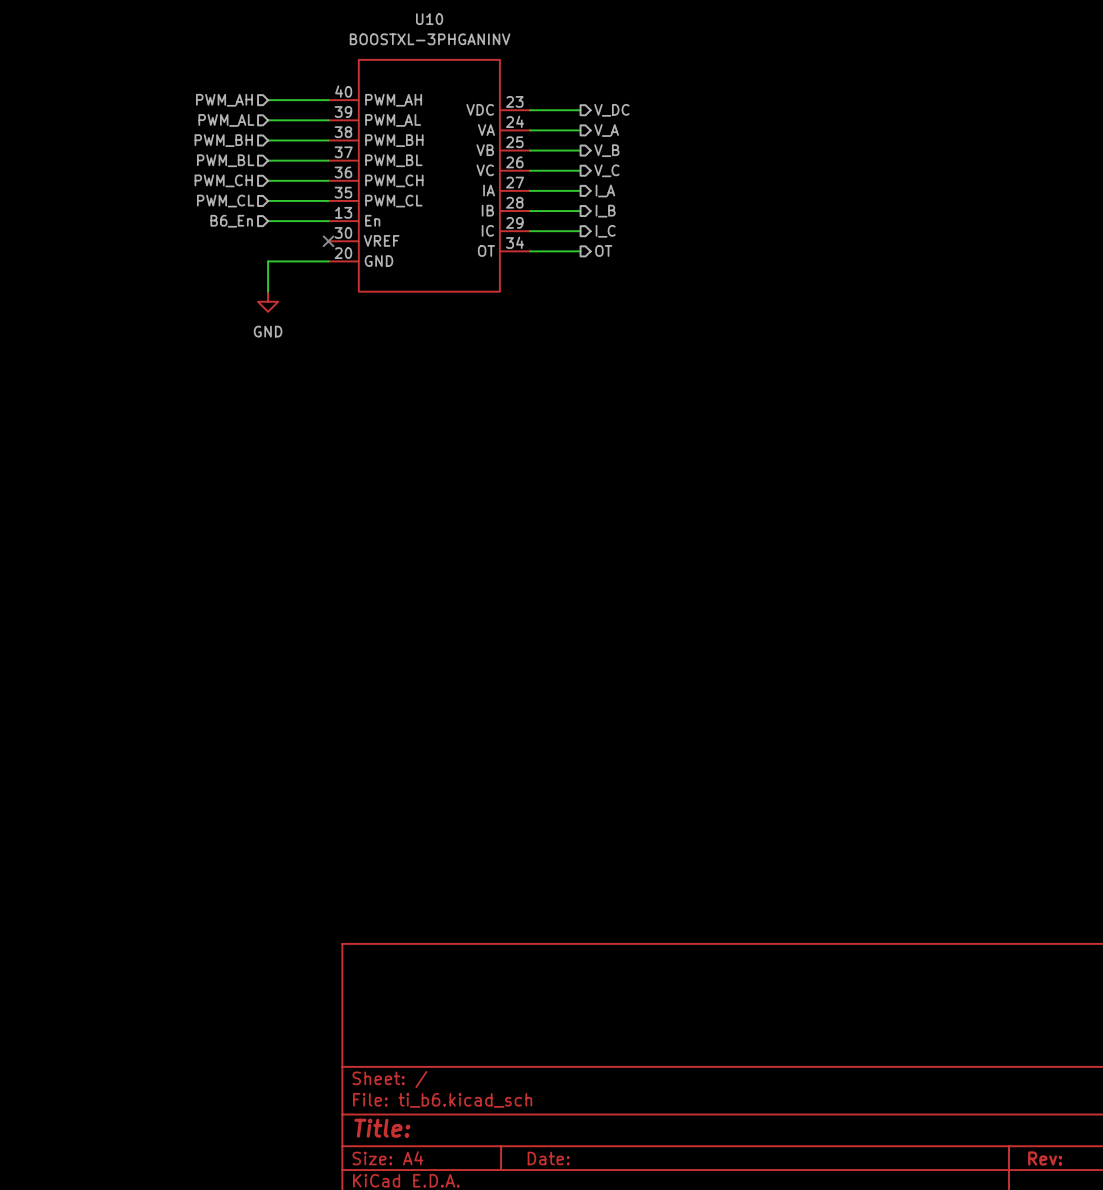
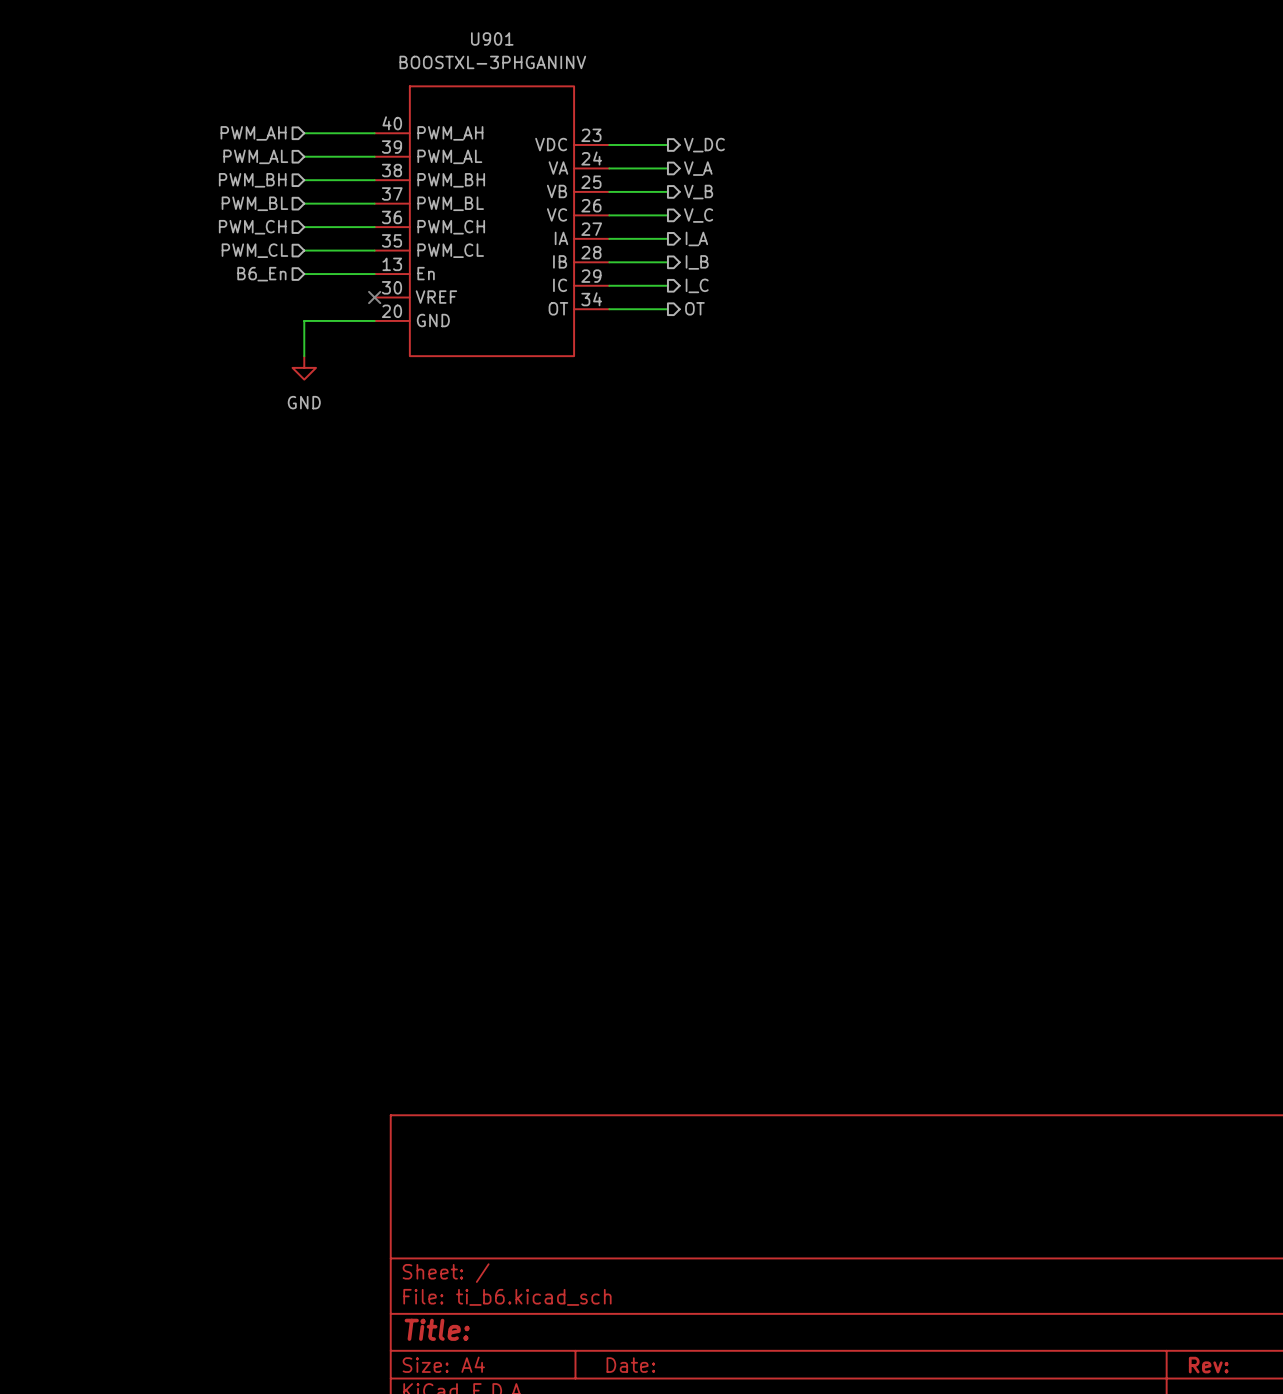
U10 name: U10 (429, 19) -> U901 (492, 38)

